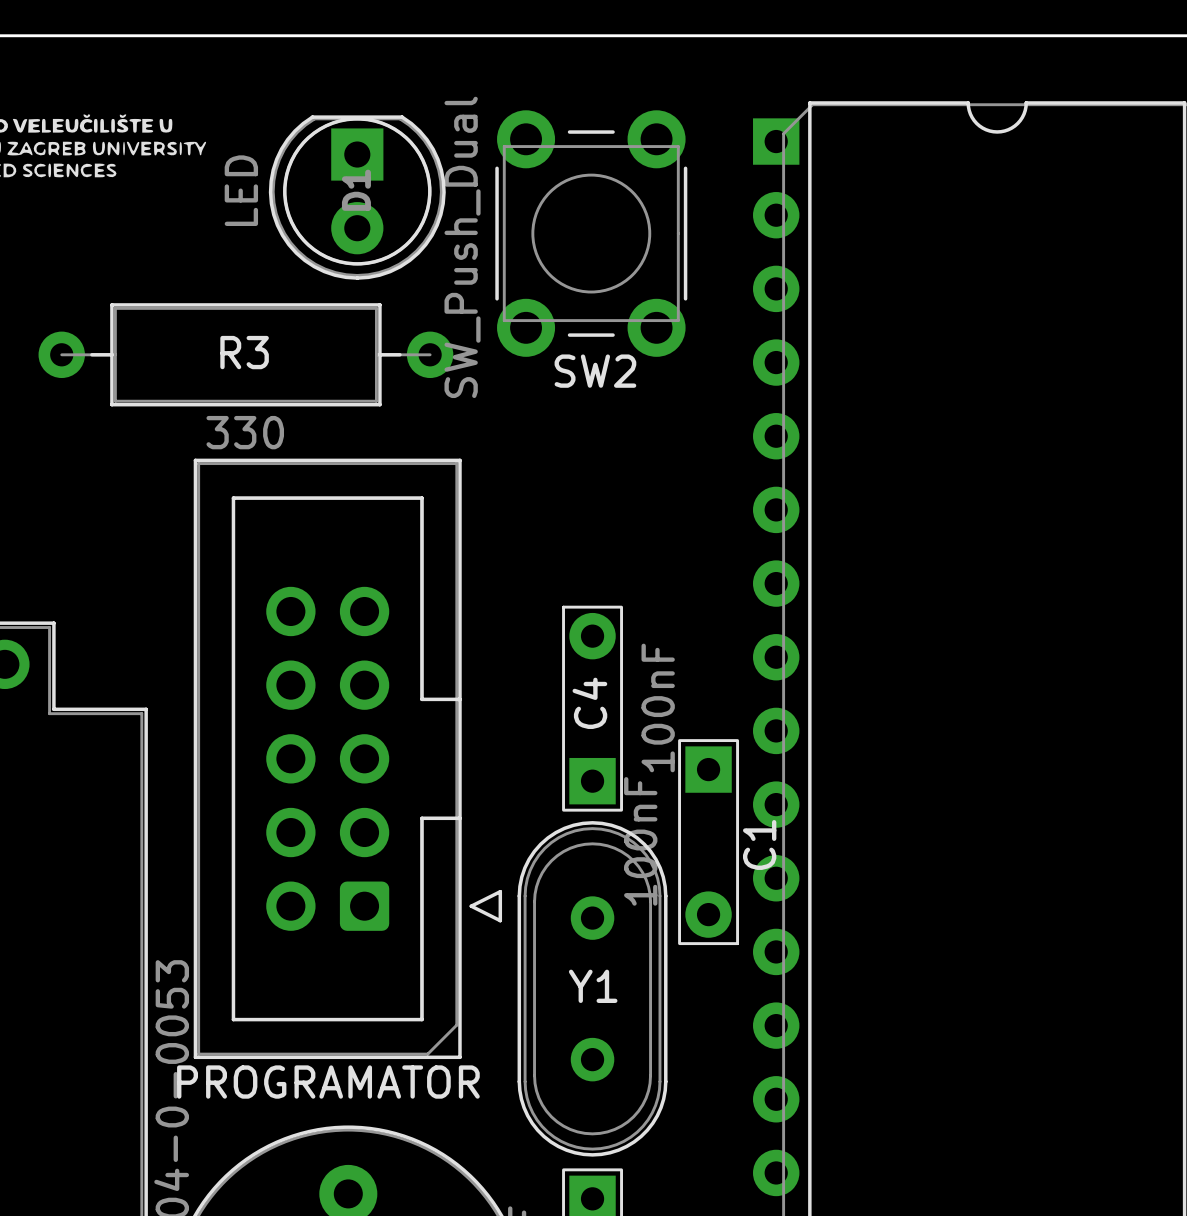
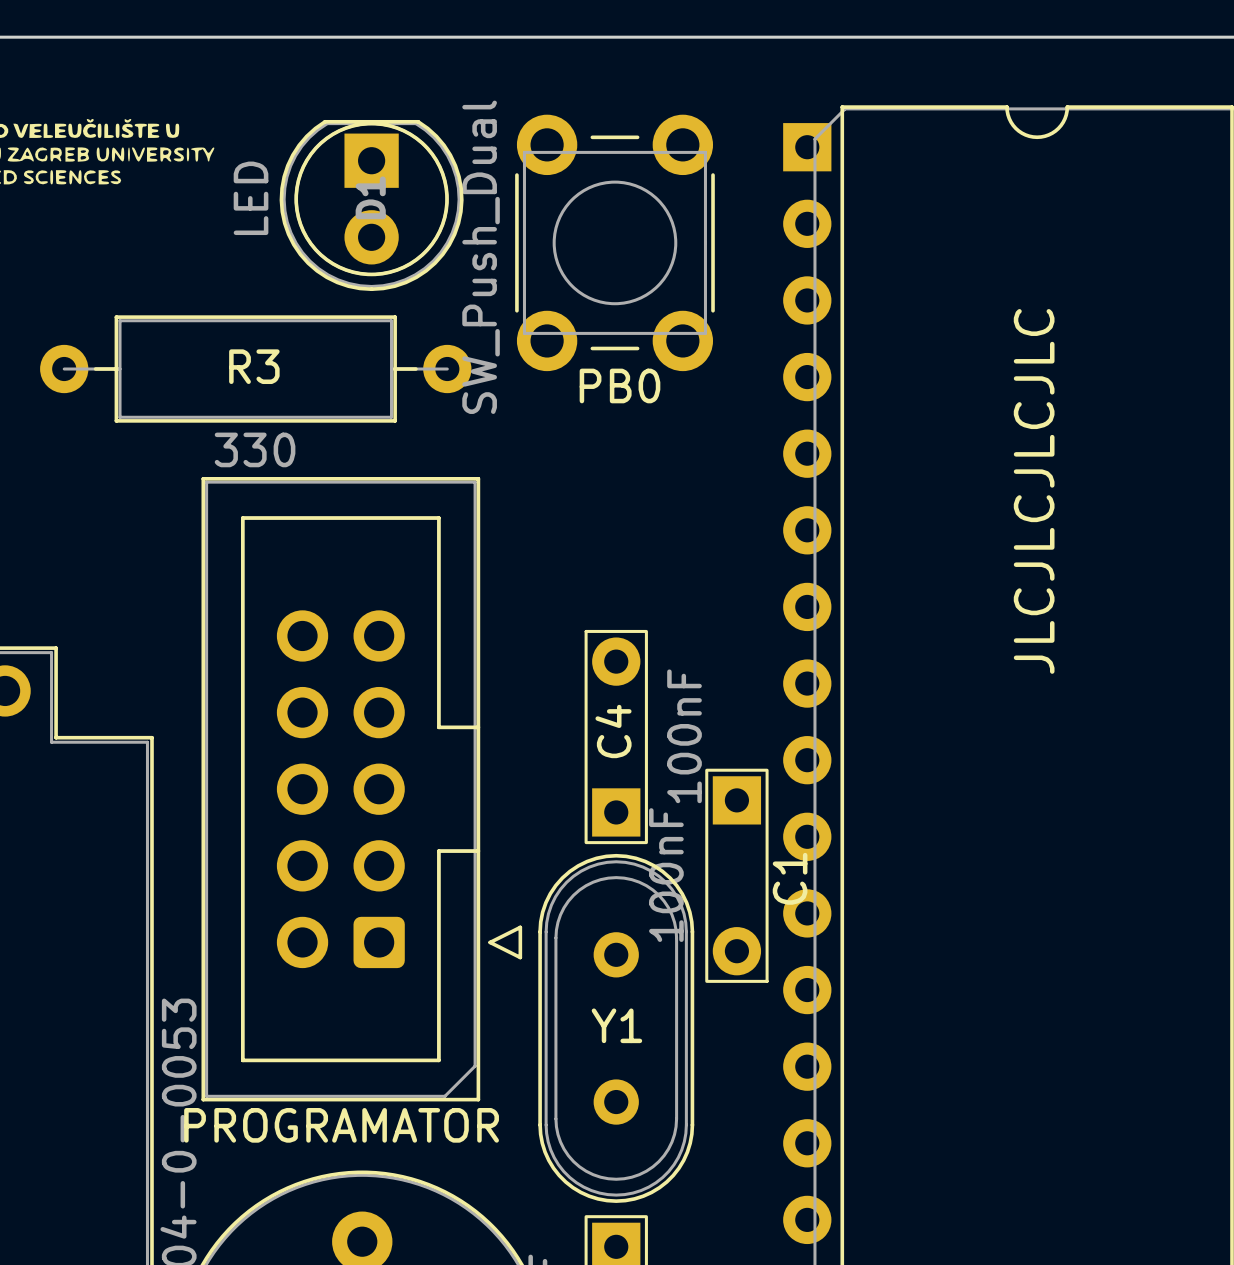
SW2 name: SW2 (595, 371) -> PB0 (619, 385)
text: none -> JLCJLCJLCJLC (1034, 491)

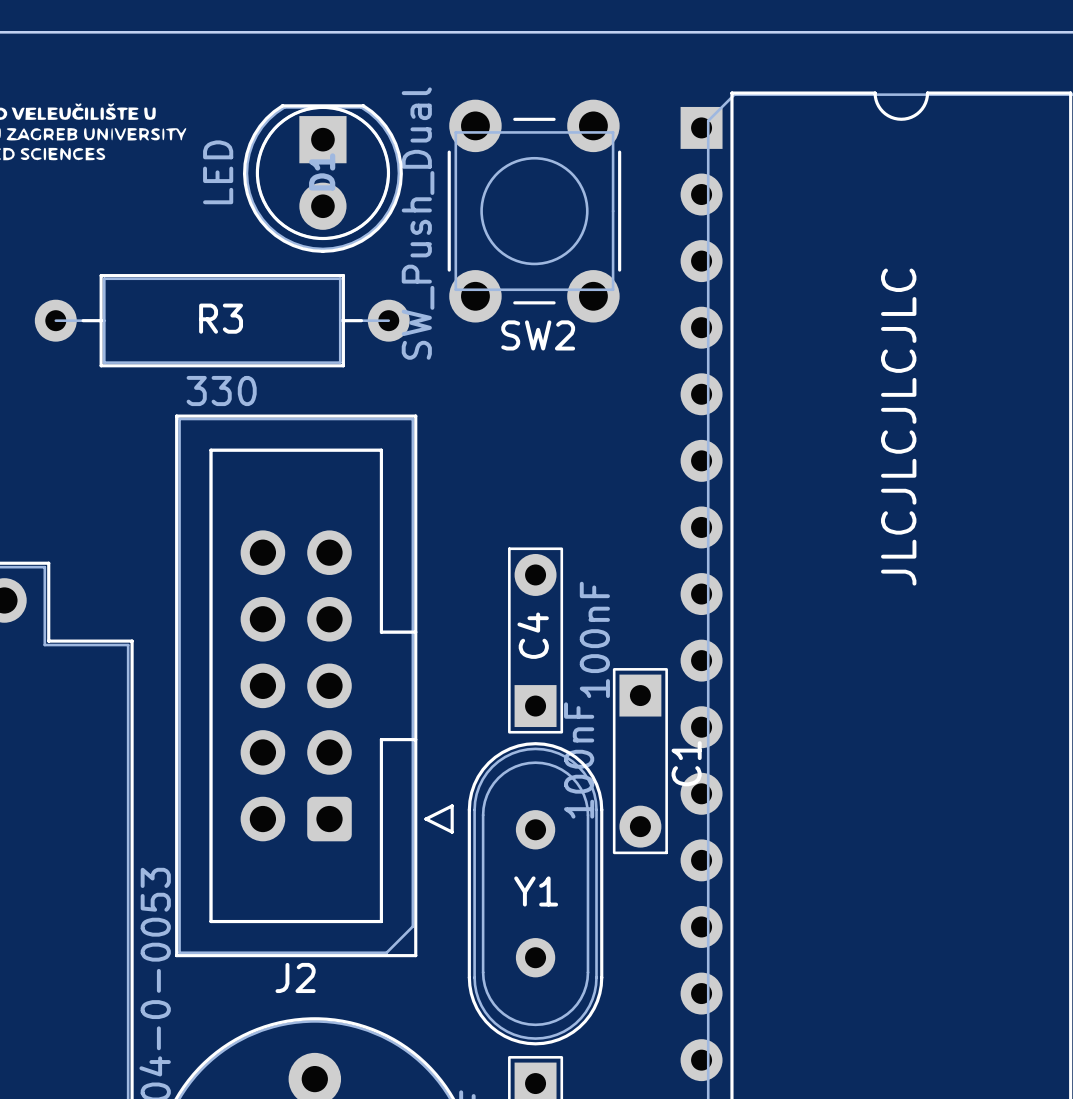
PB0 name: PB0 (619, 385) -> SW2 (538, 335)
PROGRAMATOR name: PROGRAMATOR (341, 1125) -> J2 (295, 977)

